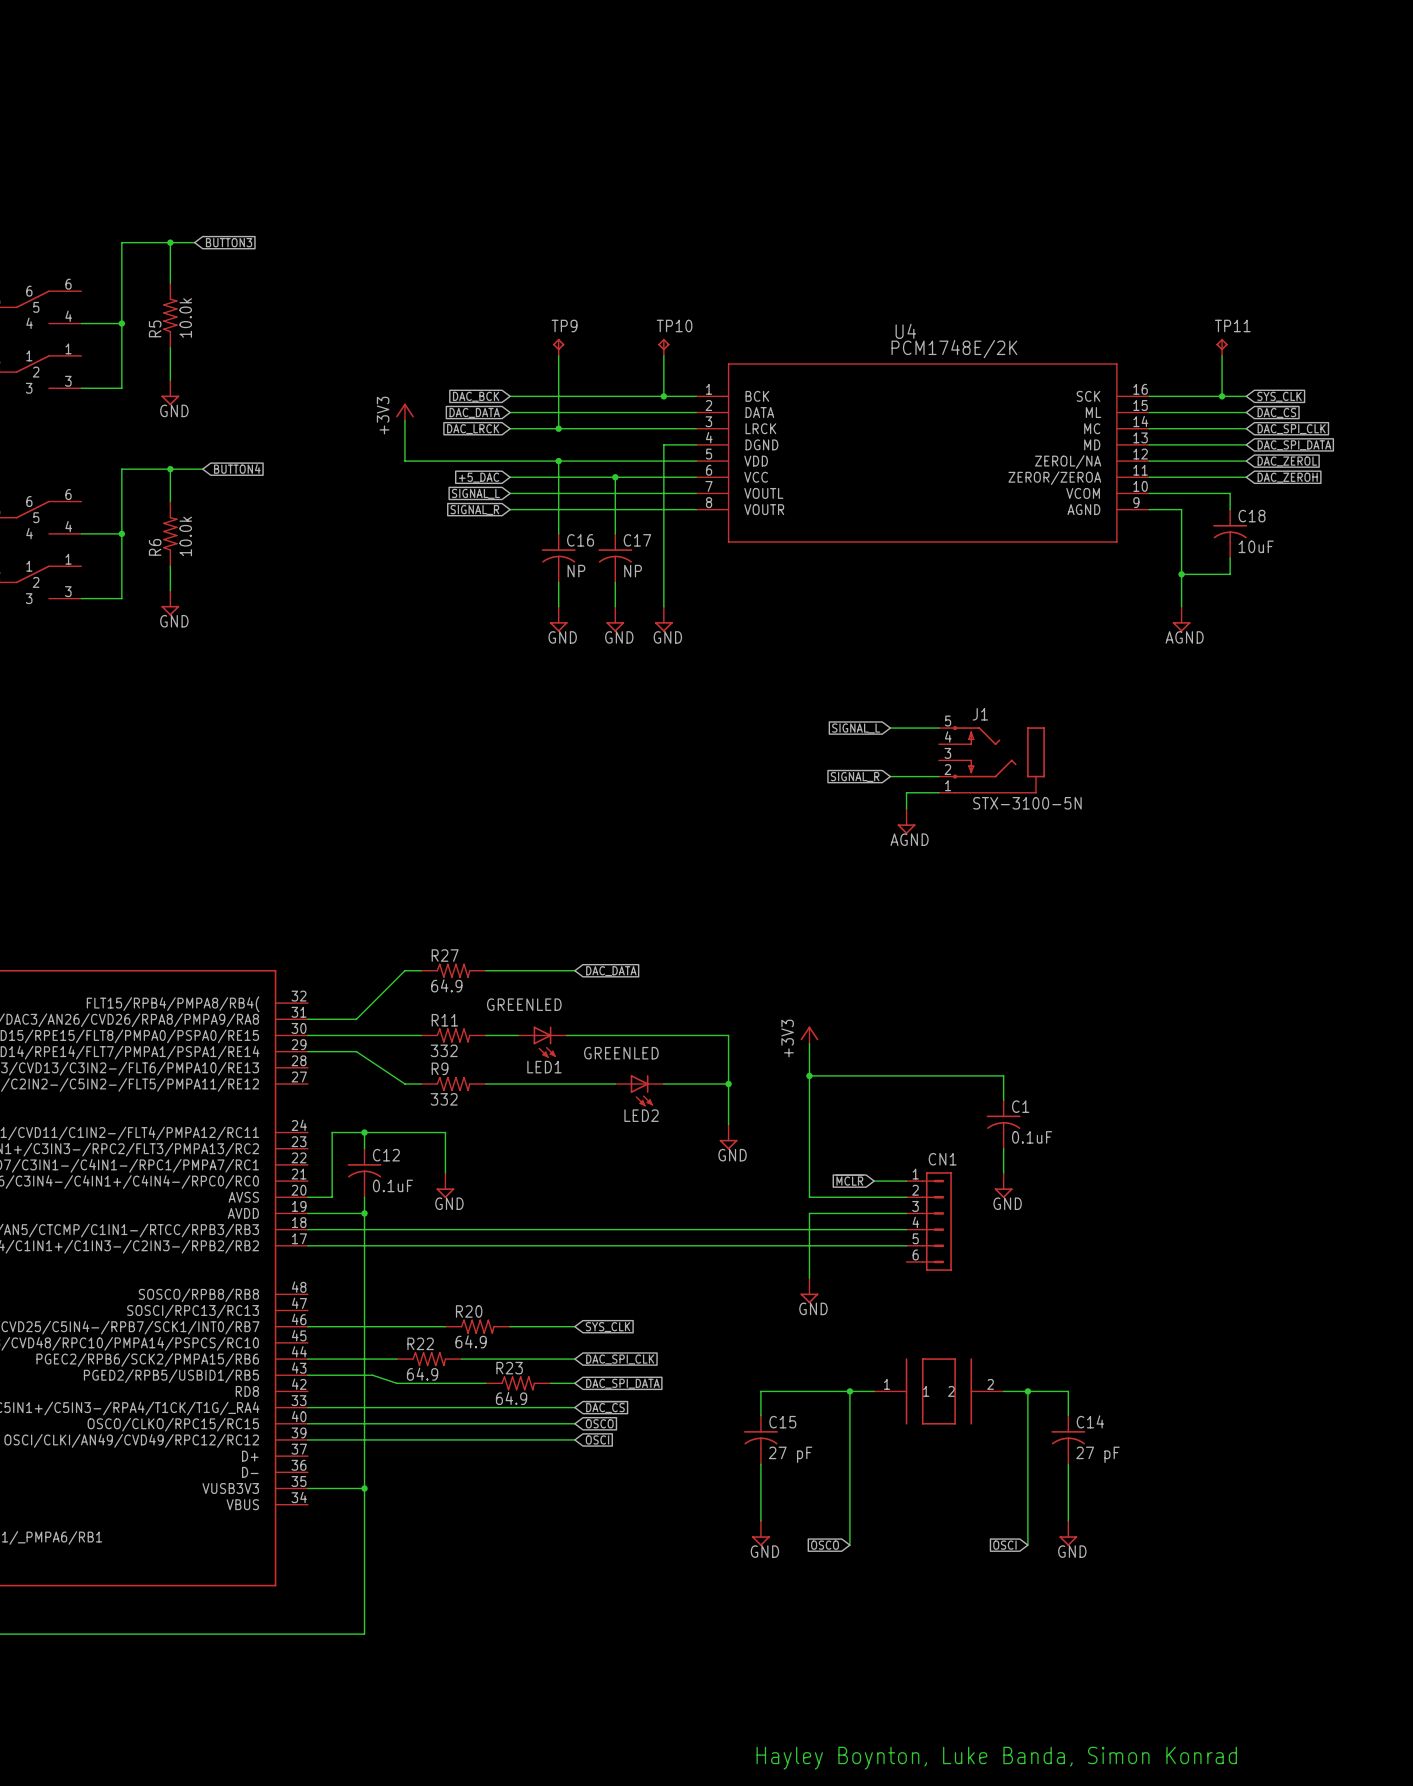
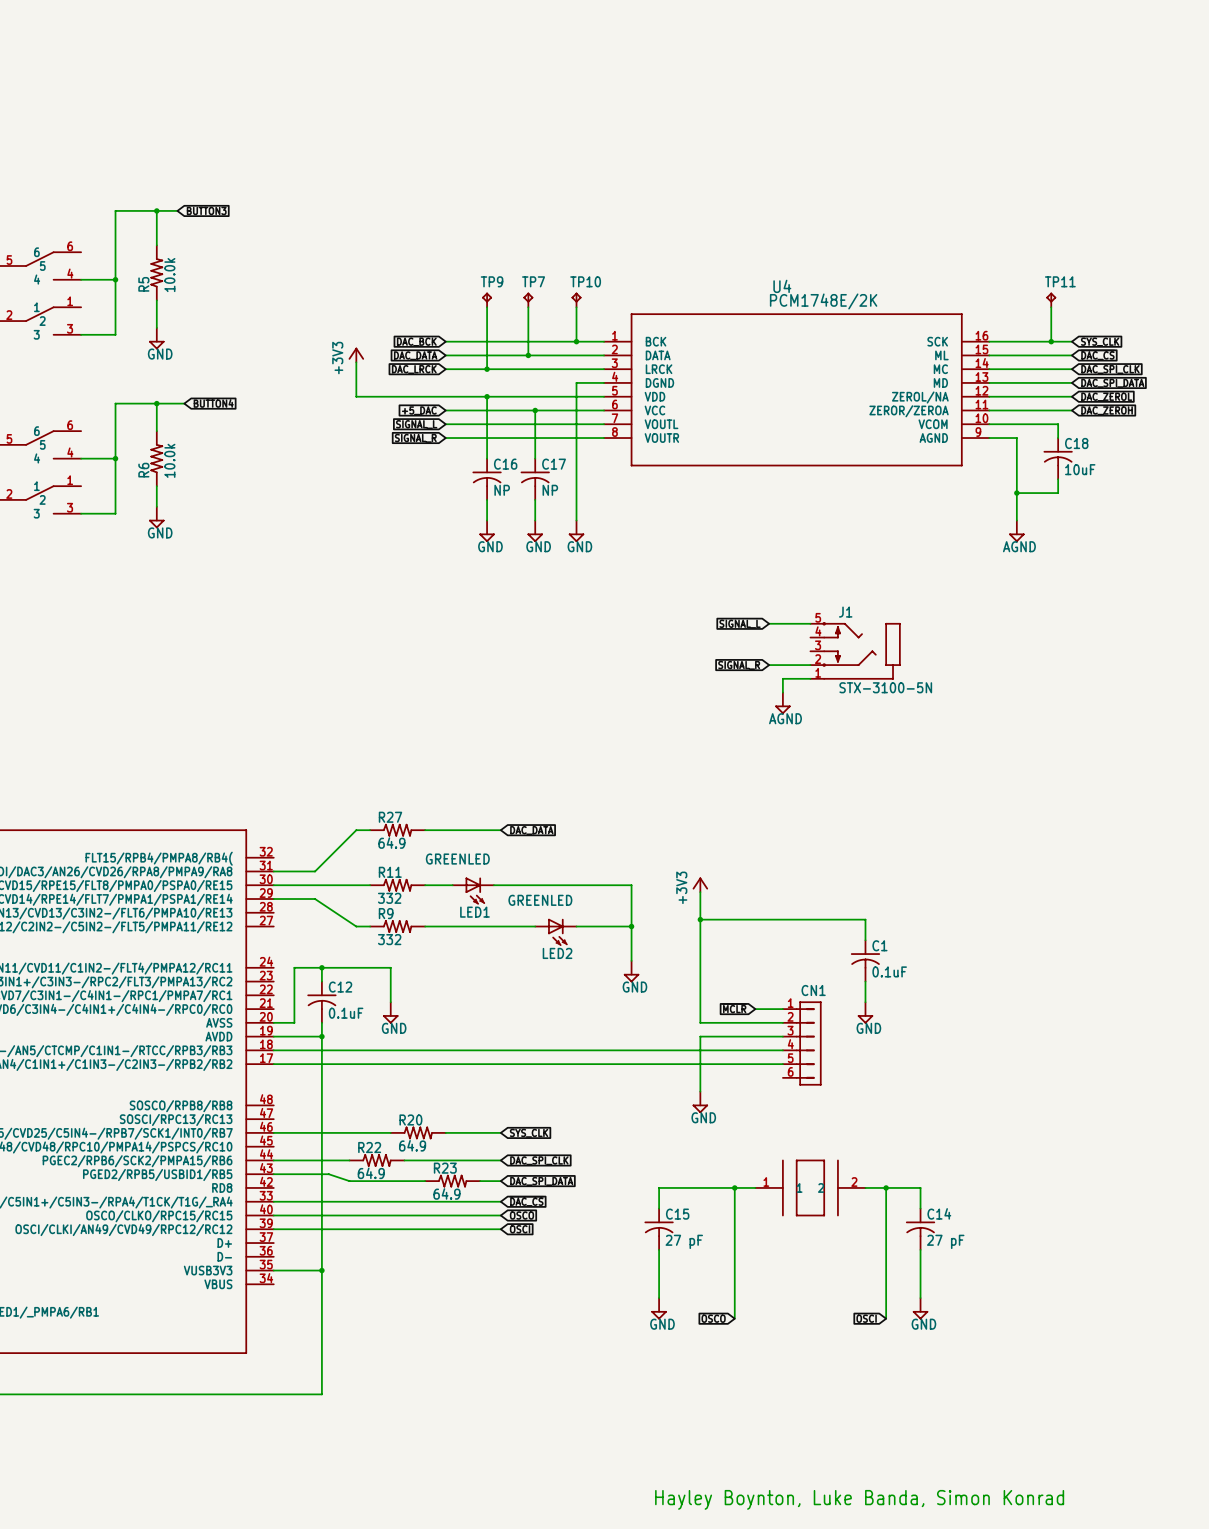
TP7: none -> (528, 300)
wire: none -> (528, 307) (528, 355)
junction: none -> (528, 355)

